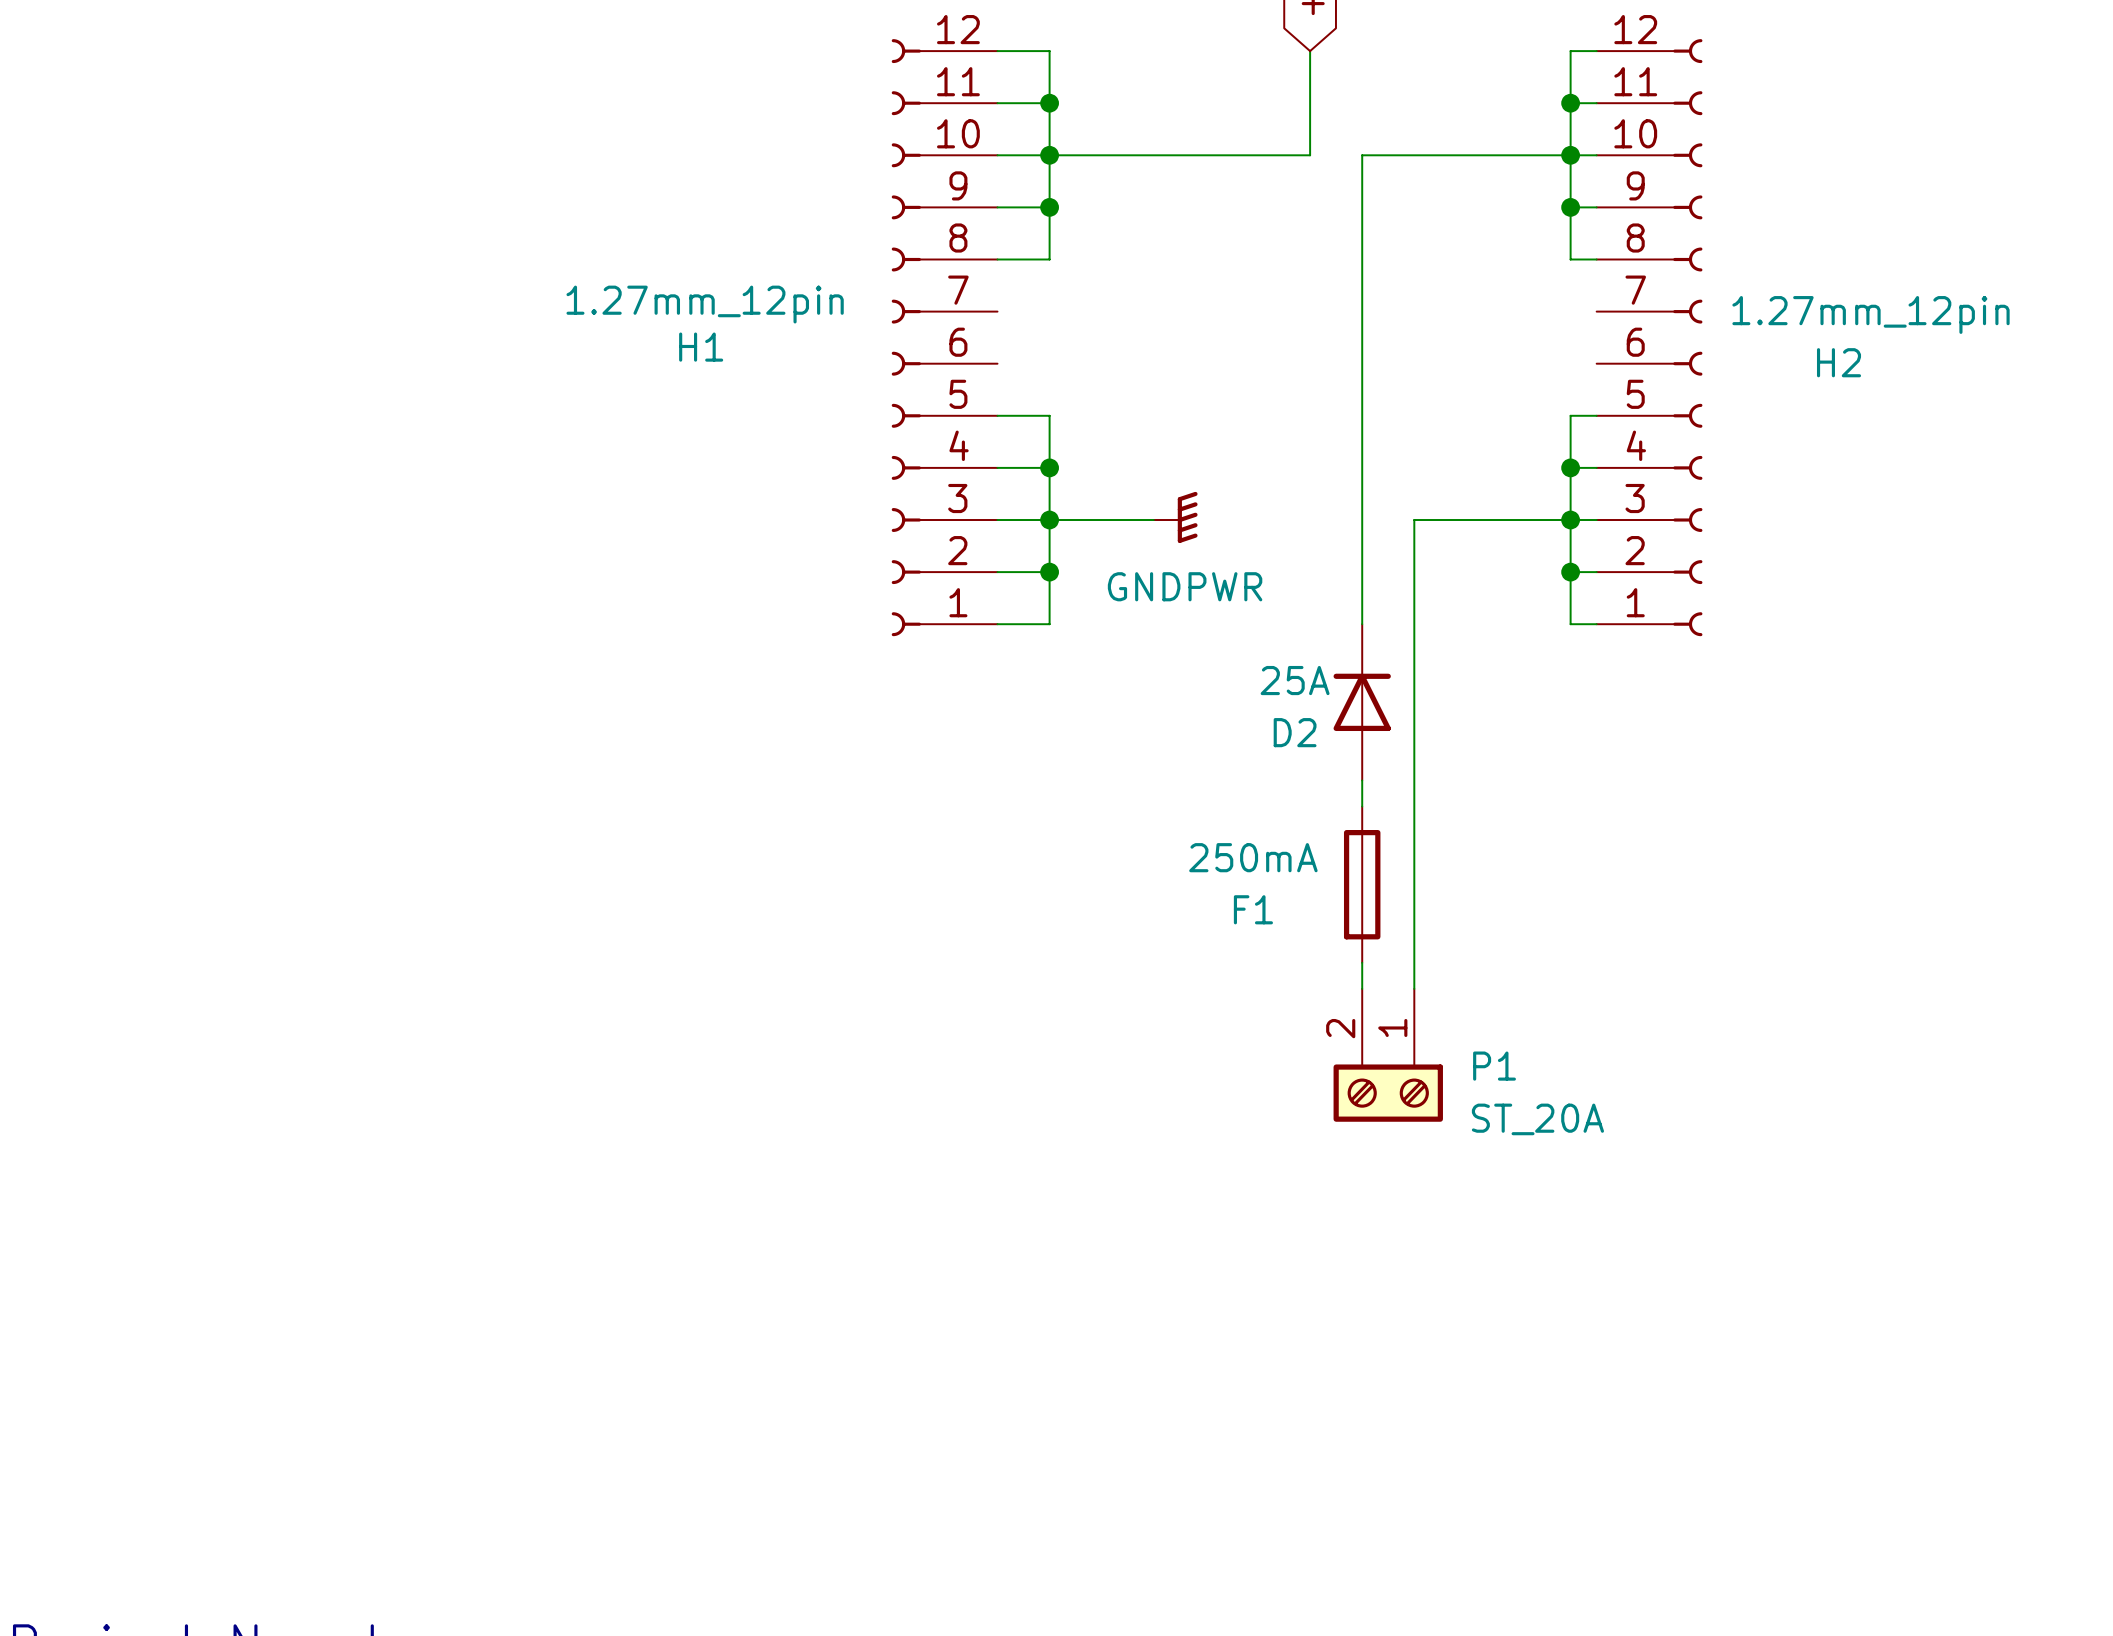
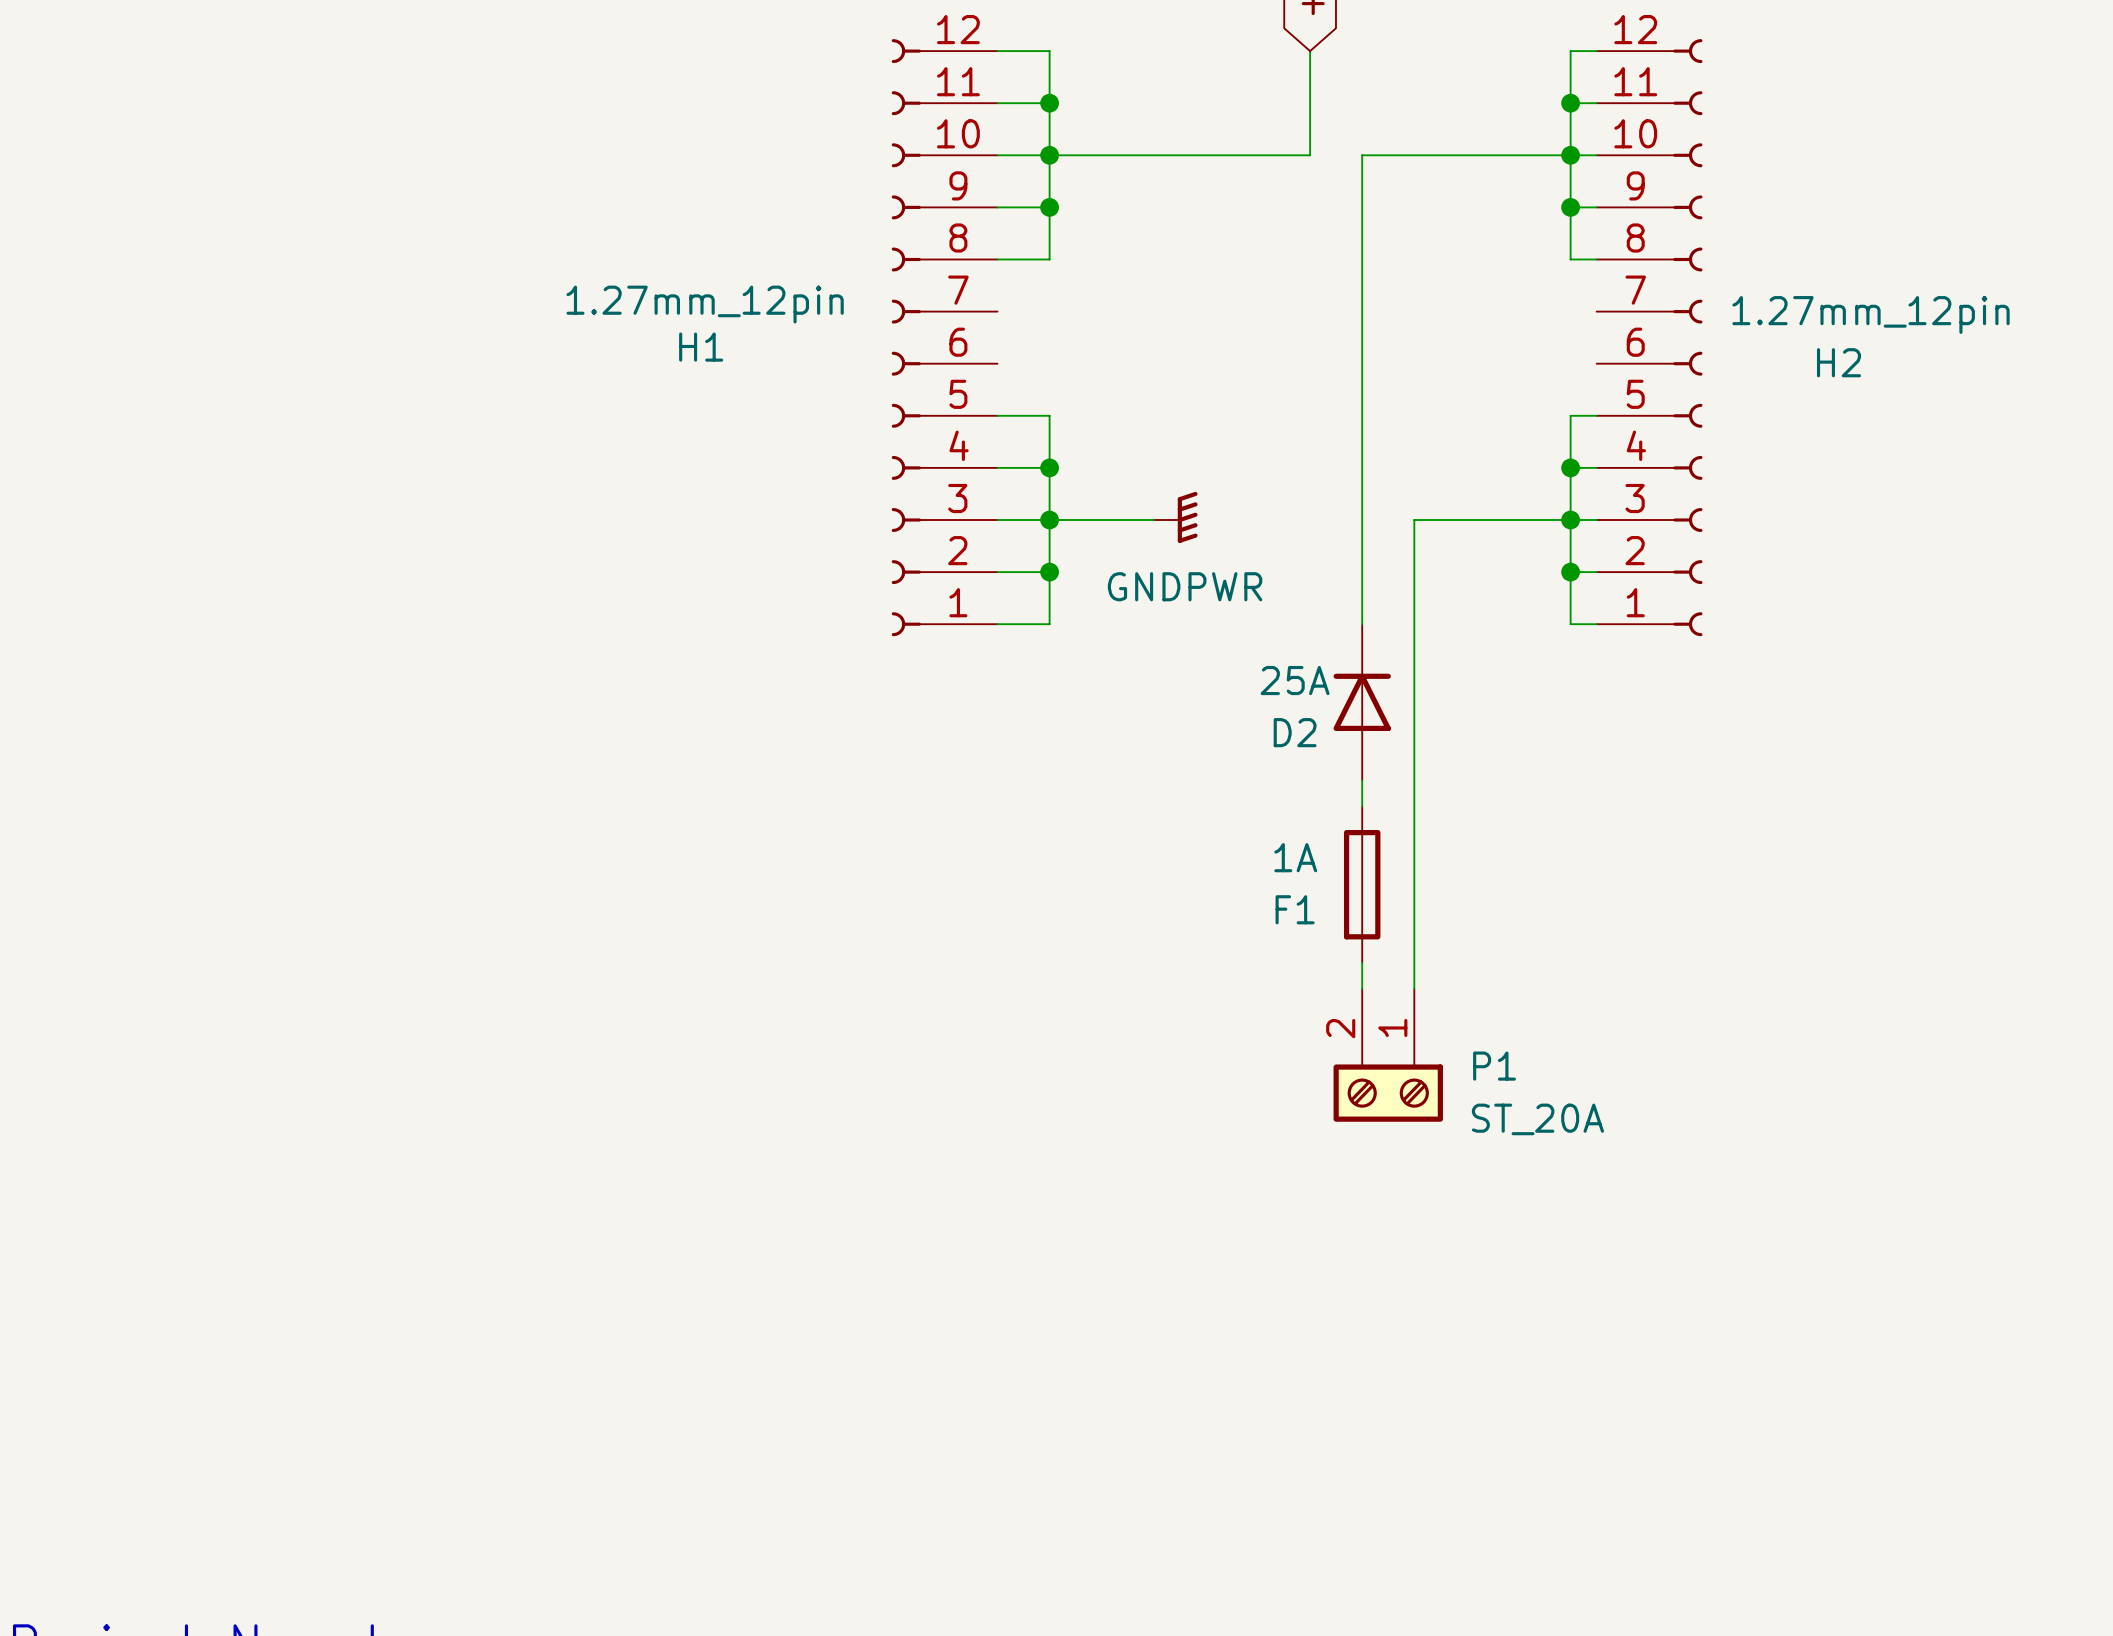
F1 value: 250mA (1253, 857) -> 1A (1295, 857)
F1 name position: F1 (1253, 909) -> F1 (1295, 909)

